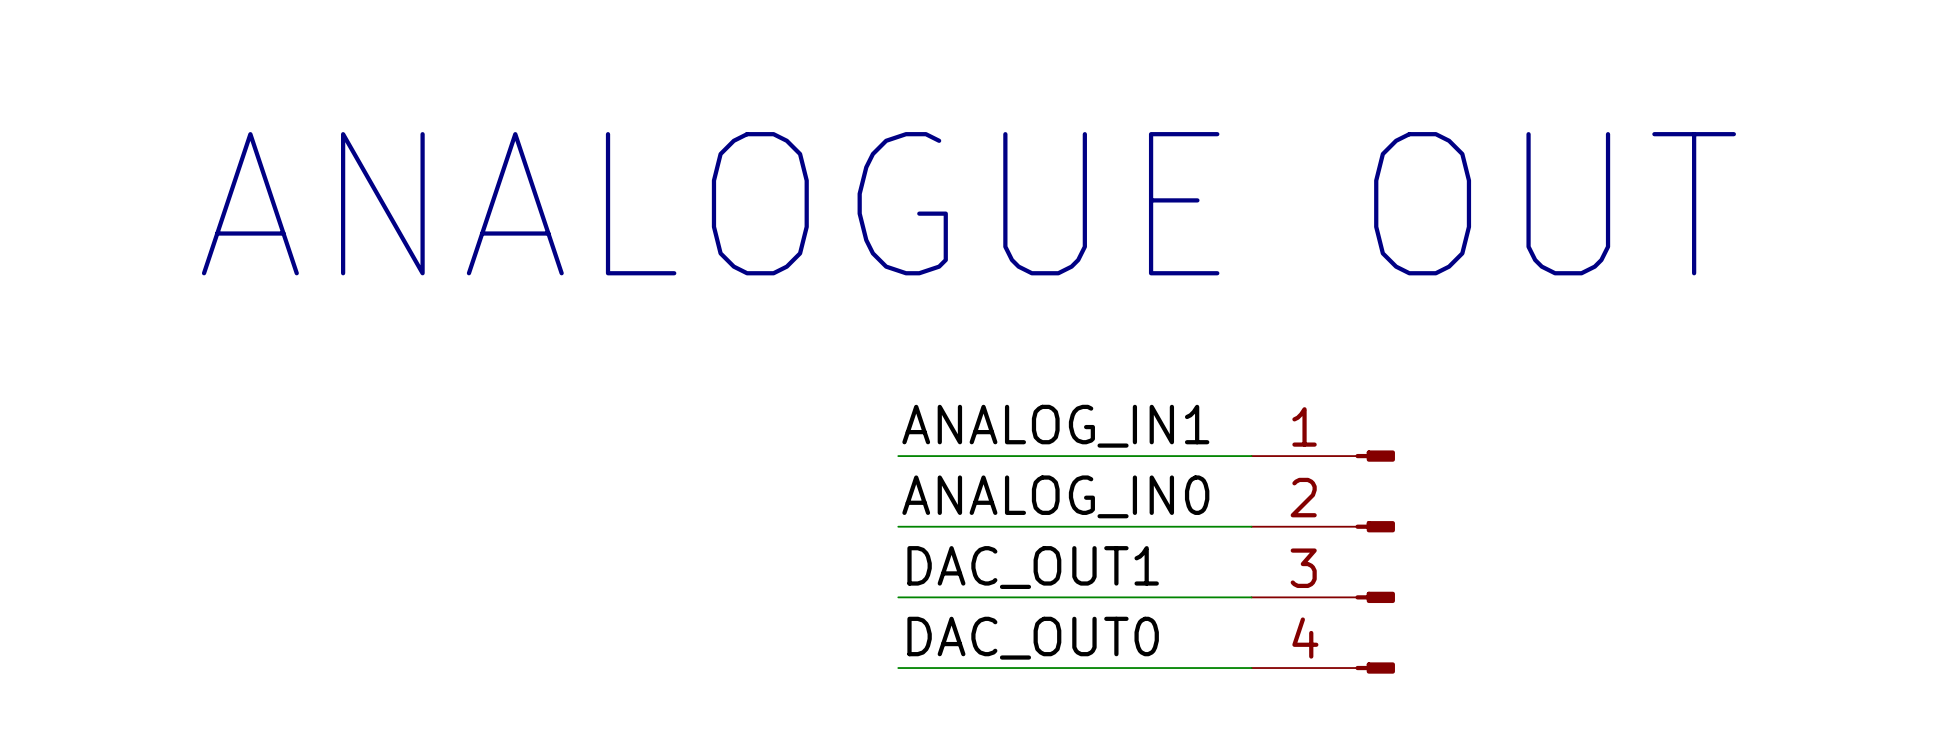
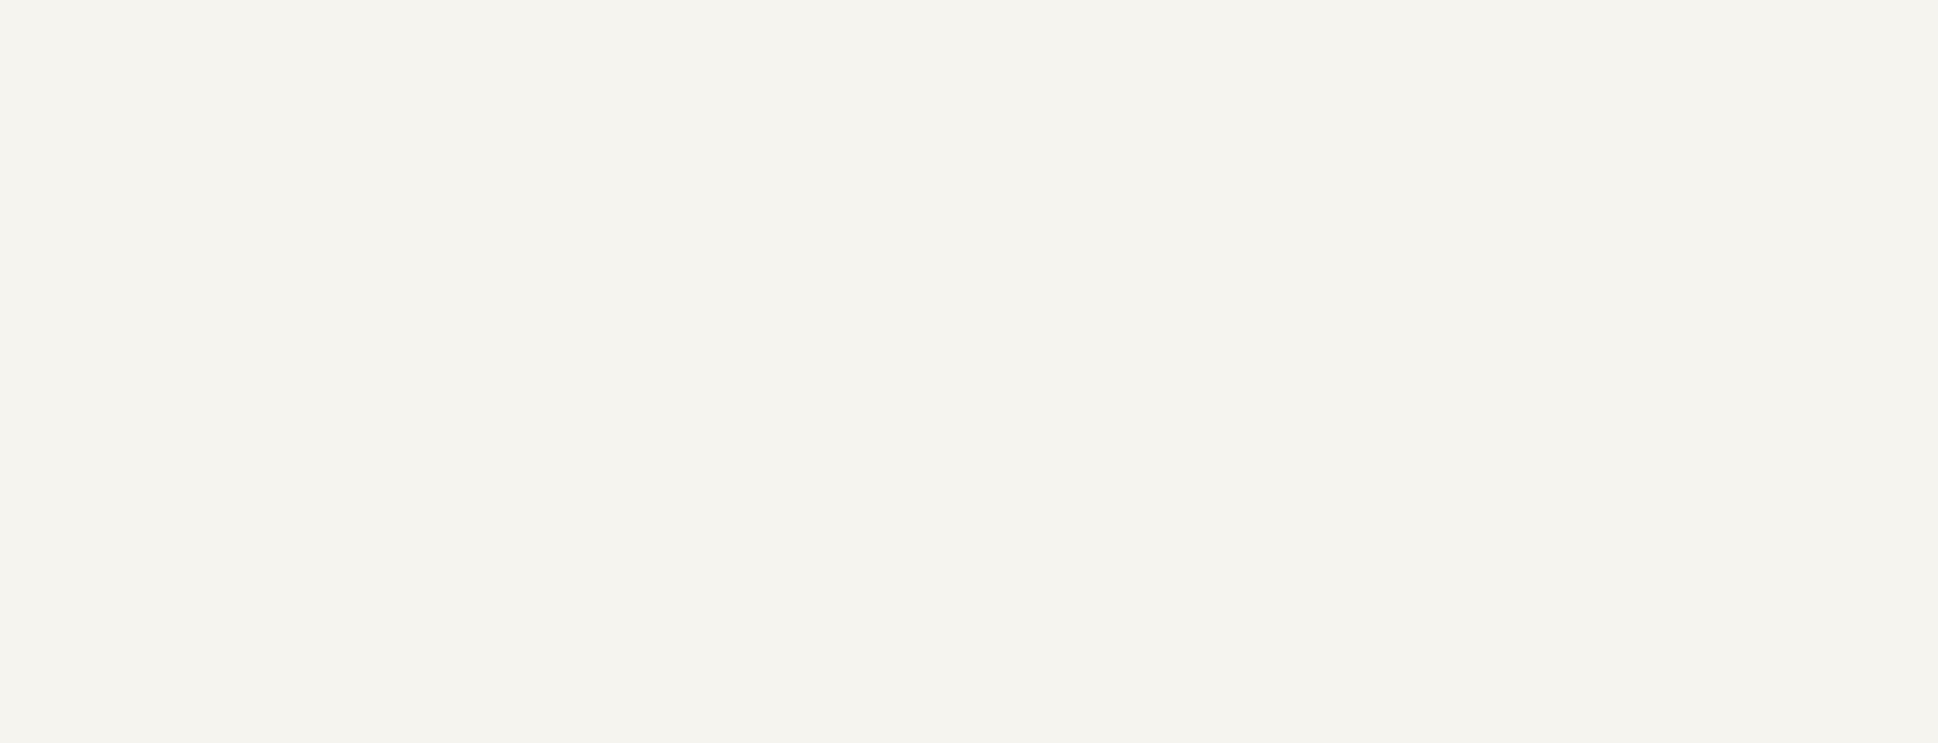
text: ANALOGUE OUT (968, 203) -> none
label: ANALOG_IN1 (1055, 426) -> none
wire: (898, 456) (1251, 456) -> none
label: ANALOG_IN0 (1055, 496) -> none
wire: (898, 526) (1251, 526) -> none
part: (1323, 562) -> none
label: DAC_OUT1 (1033, 567) -> none
wire: (898, 597) (1251, 597) -> none
label: DAC_OUT0 (1033, 638) -> none
wire: (898, 668) (1251, 668) -> none

